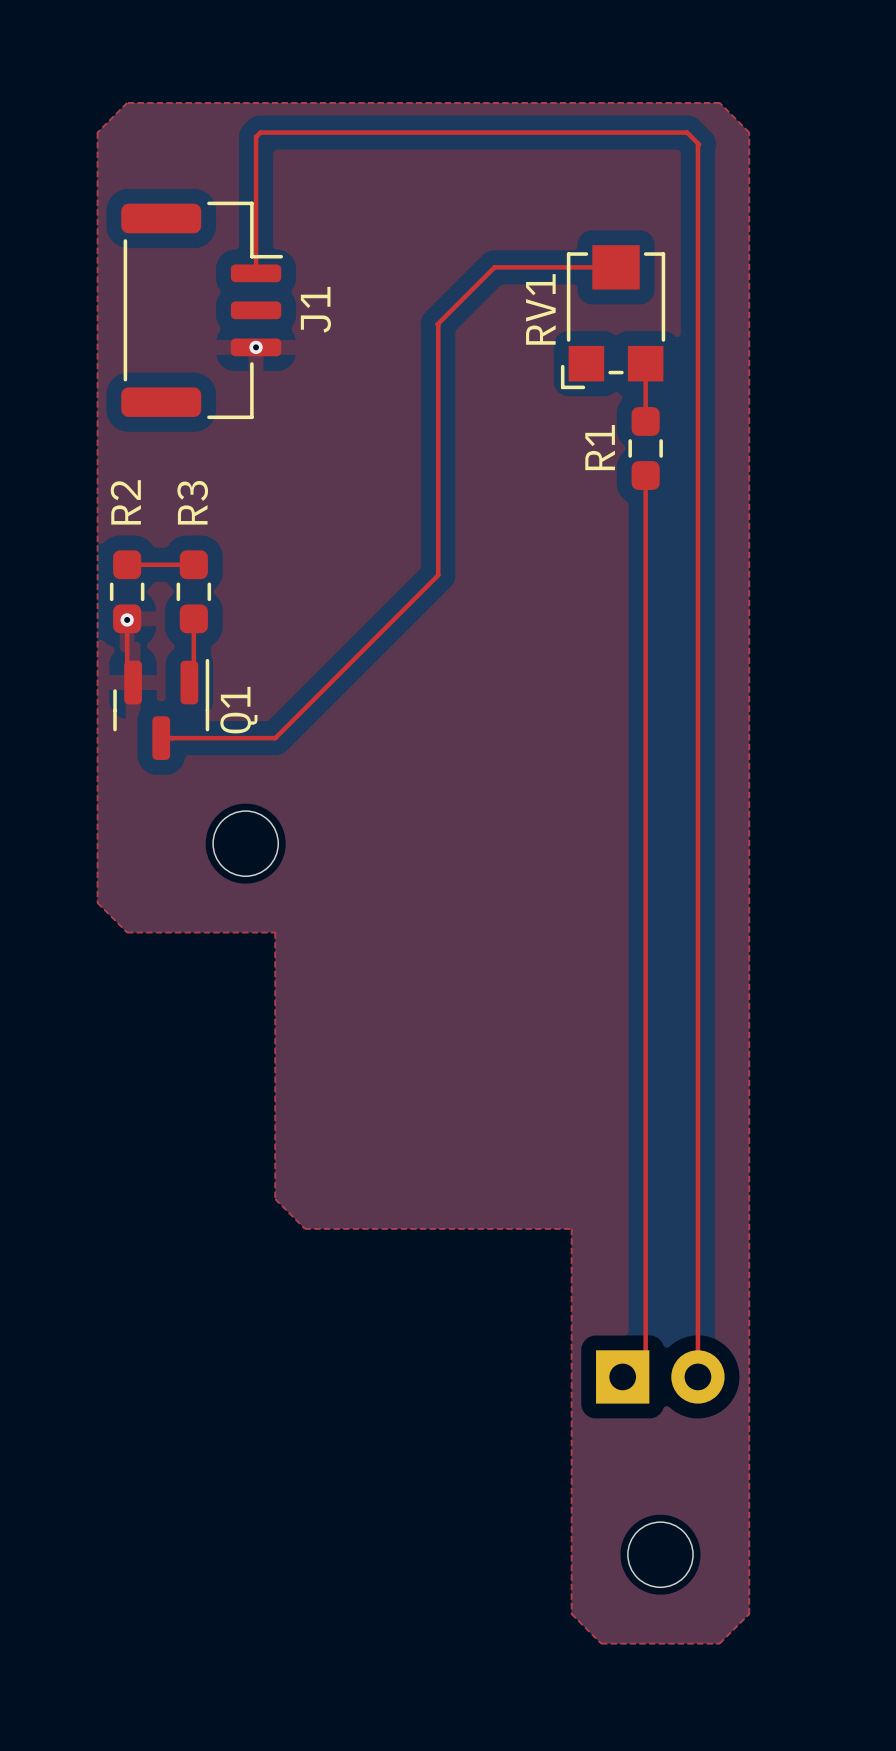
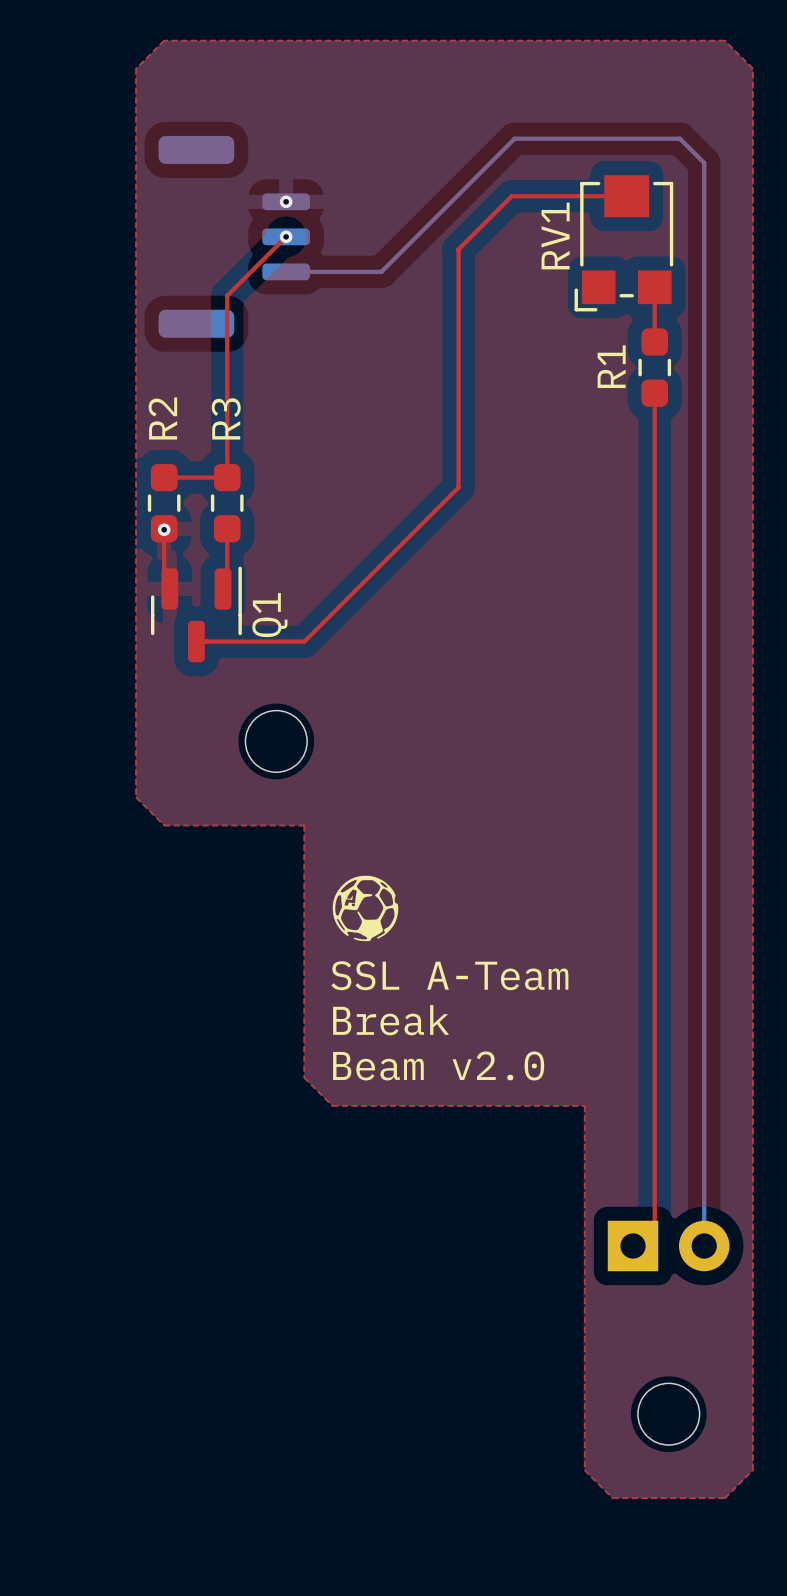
top track: (256, 273) (256, 137) (260, 132) (687, 132) (698, 144) (697, 1376) -> none
via: none -> (286, 201)
J1 side: top (202, 310) -> bottom (234, 236)
top track: none -> (286, 236) (227, 295) (227, 477)
via: none -> (286, 236)
bottom track: none -> (286, 271) (381, 271) (514, 138) (679, 138) (704, 162) (704, 1246)
via: (256, 347) -> none
drawing: none -> [332, 875, 399, 942]
text: none -> SSL A-Team (449, 975)
text: none -> Break (391, 1020)
text: none -> Beam v2.0 (438, 1065)

